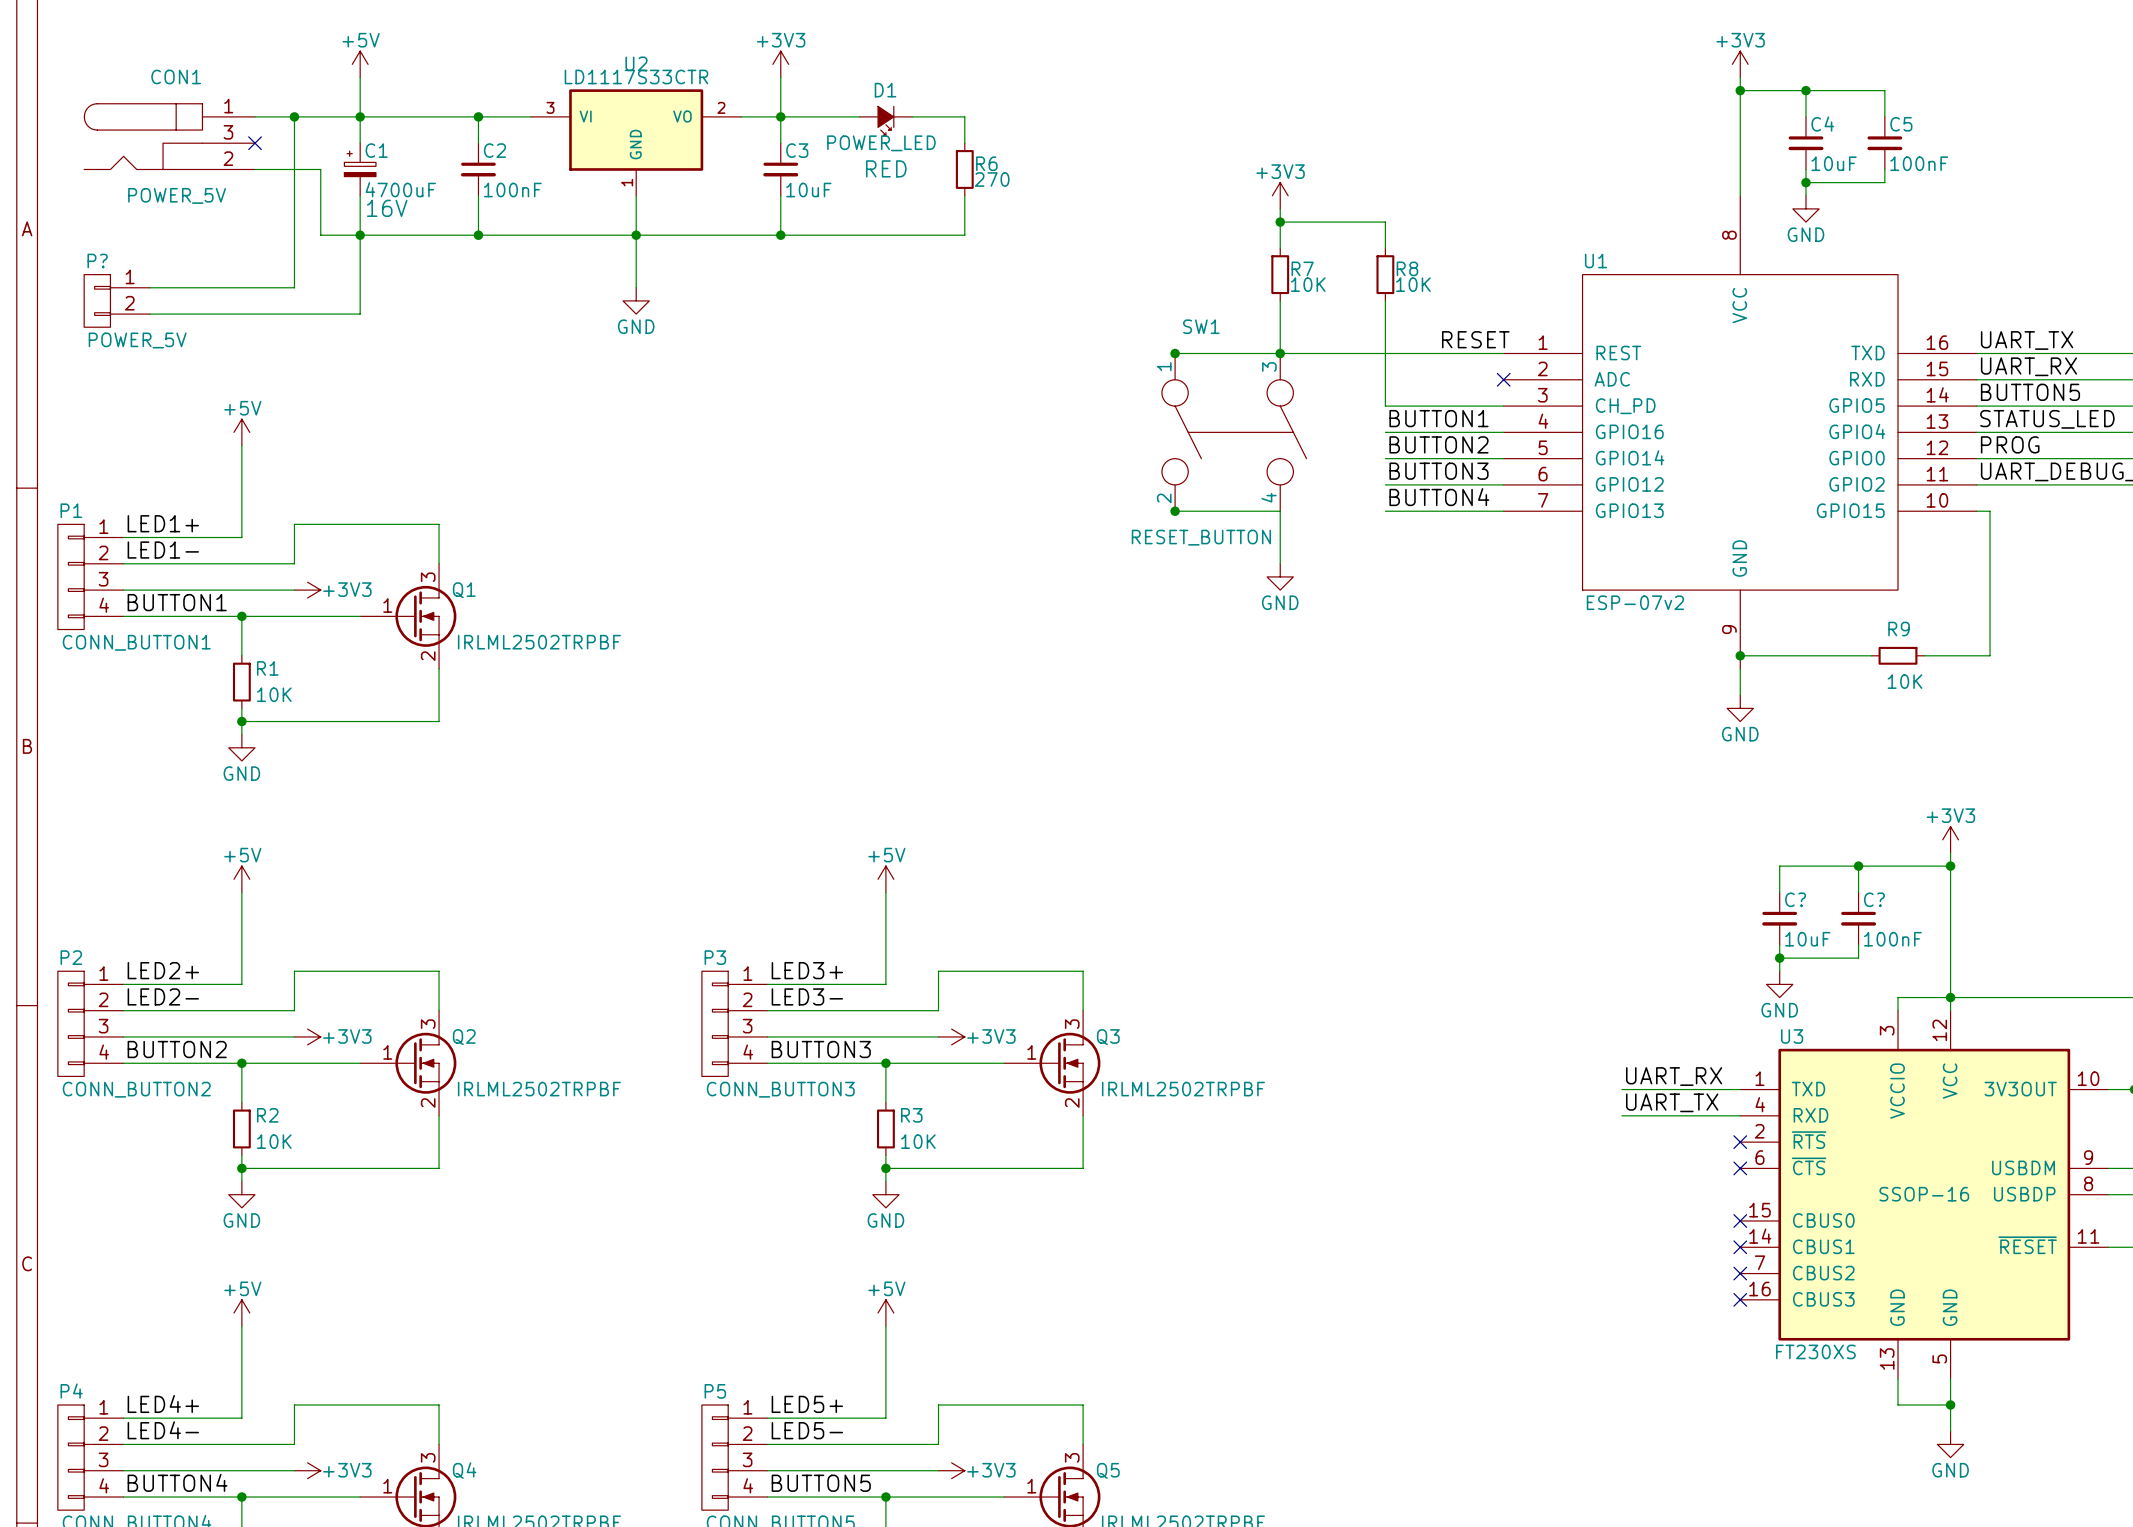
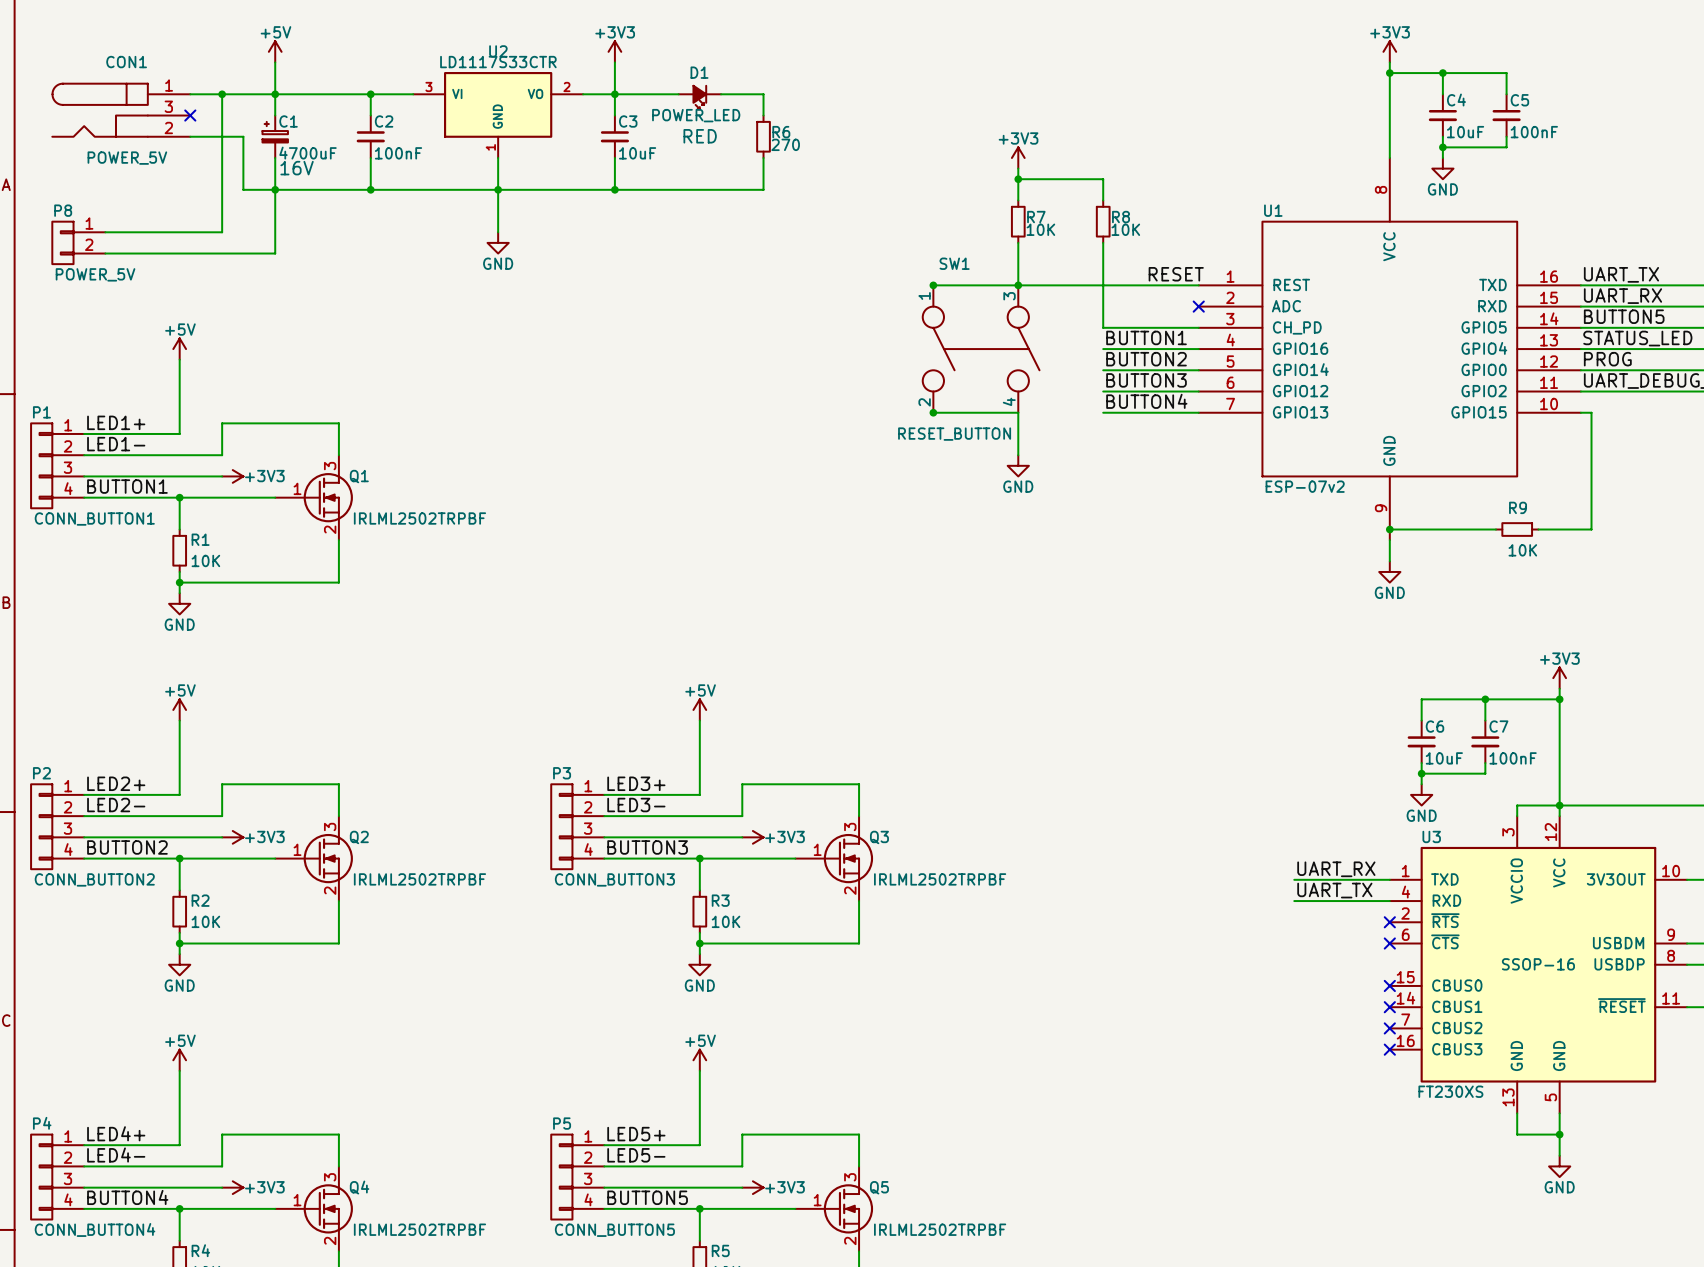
P? name: P? (97, 261) -> P8 (63, 210)
C? name: C? (1795, 899) -> C6 (1434, 726)
C? name: C? (1874, 899) -> C7 (1498, 726)

